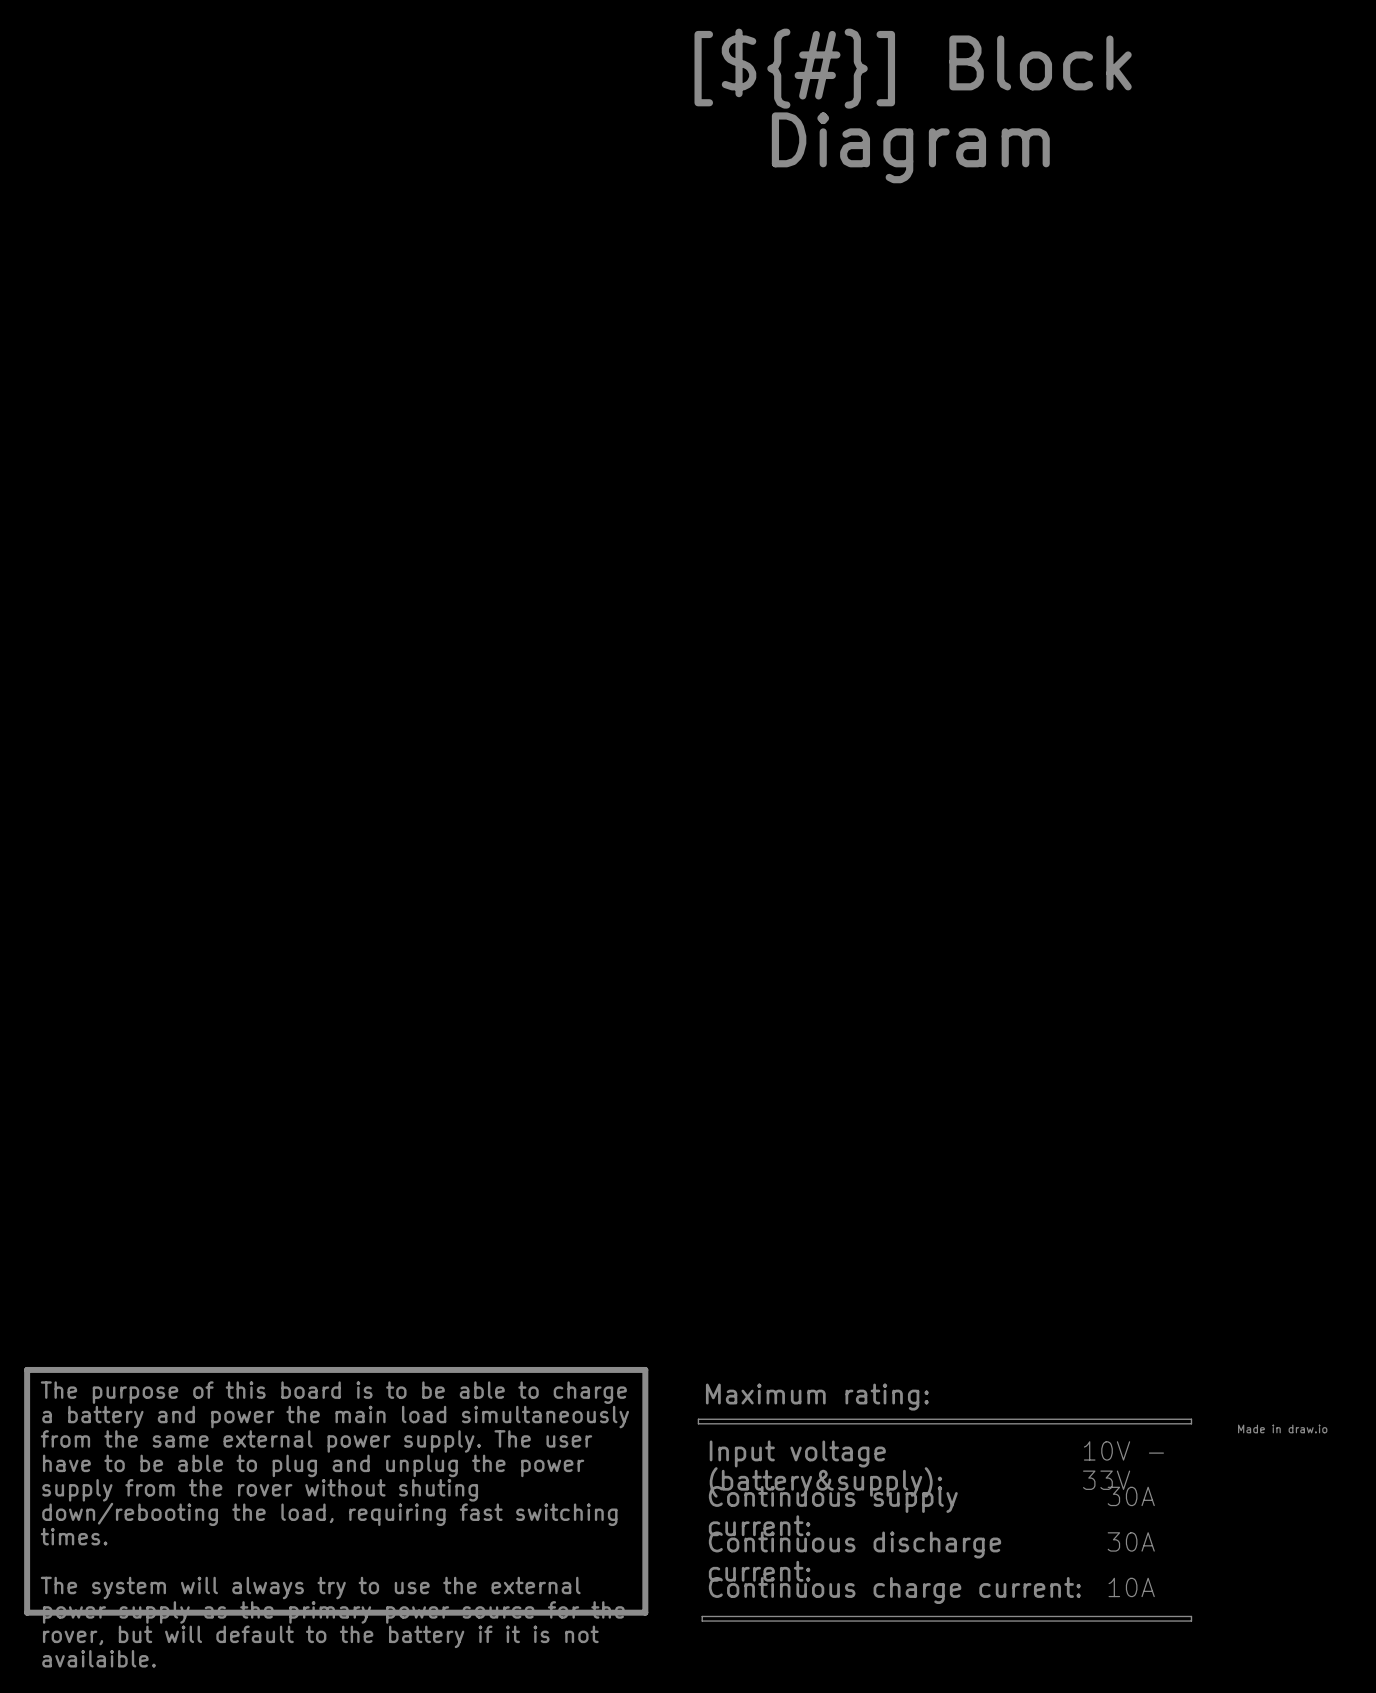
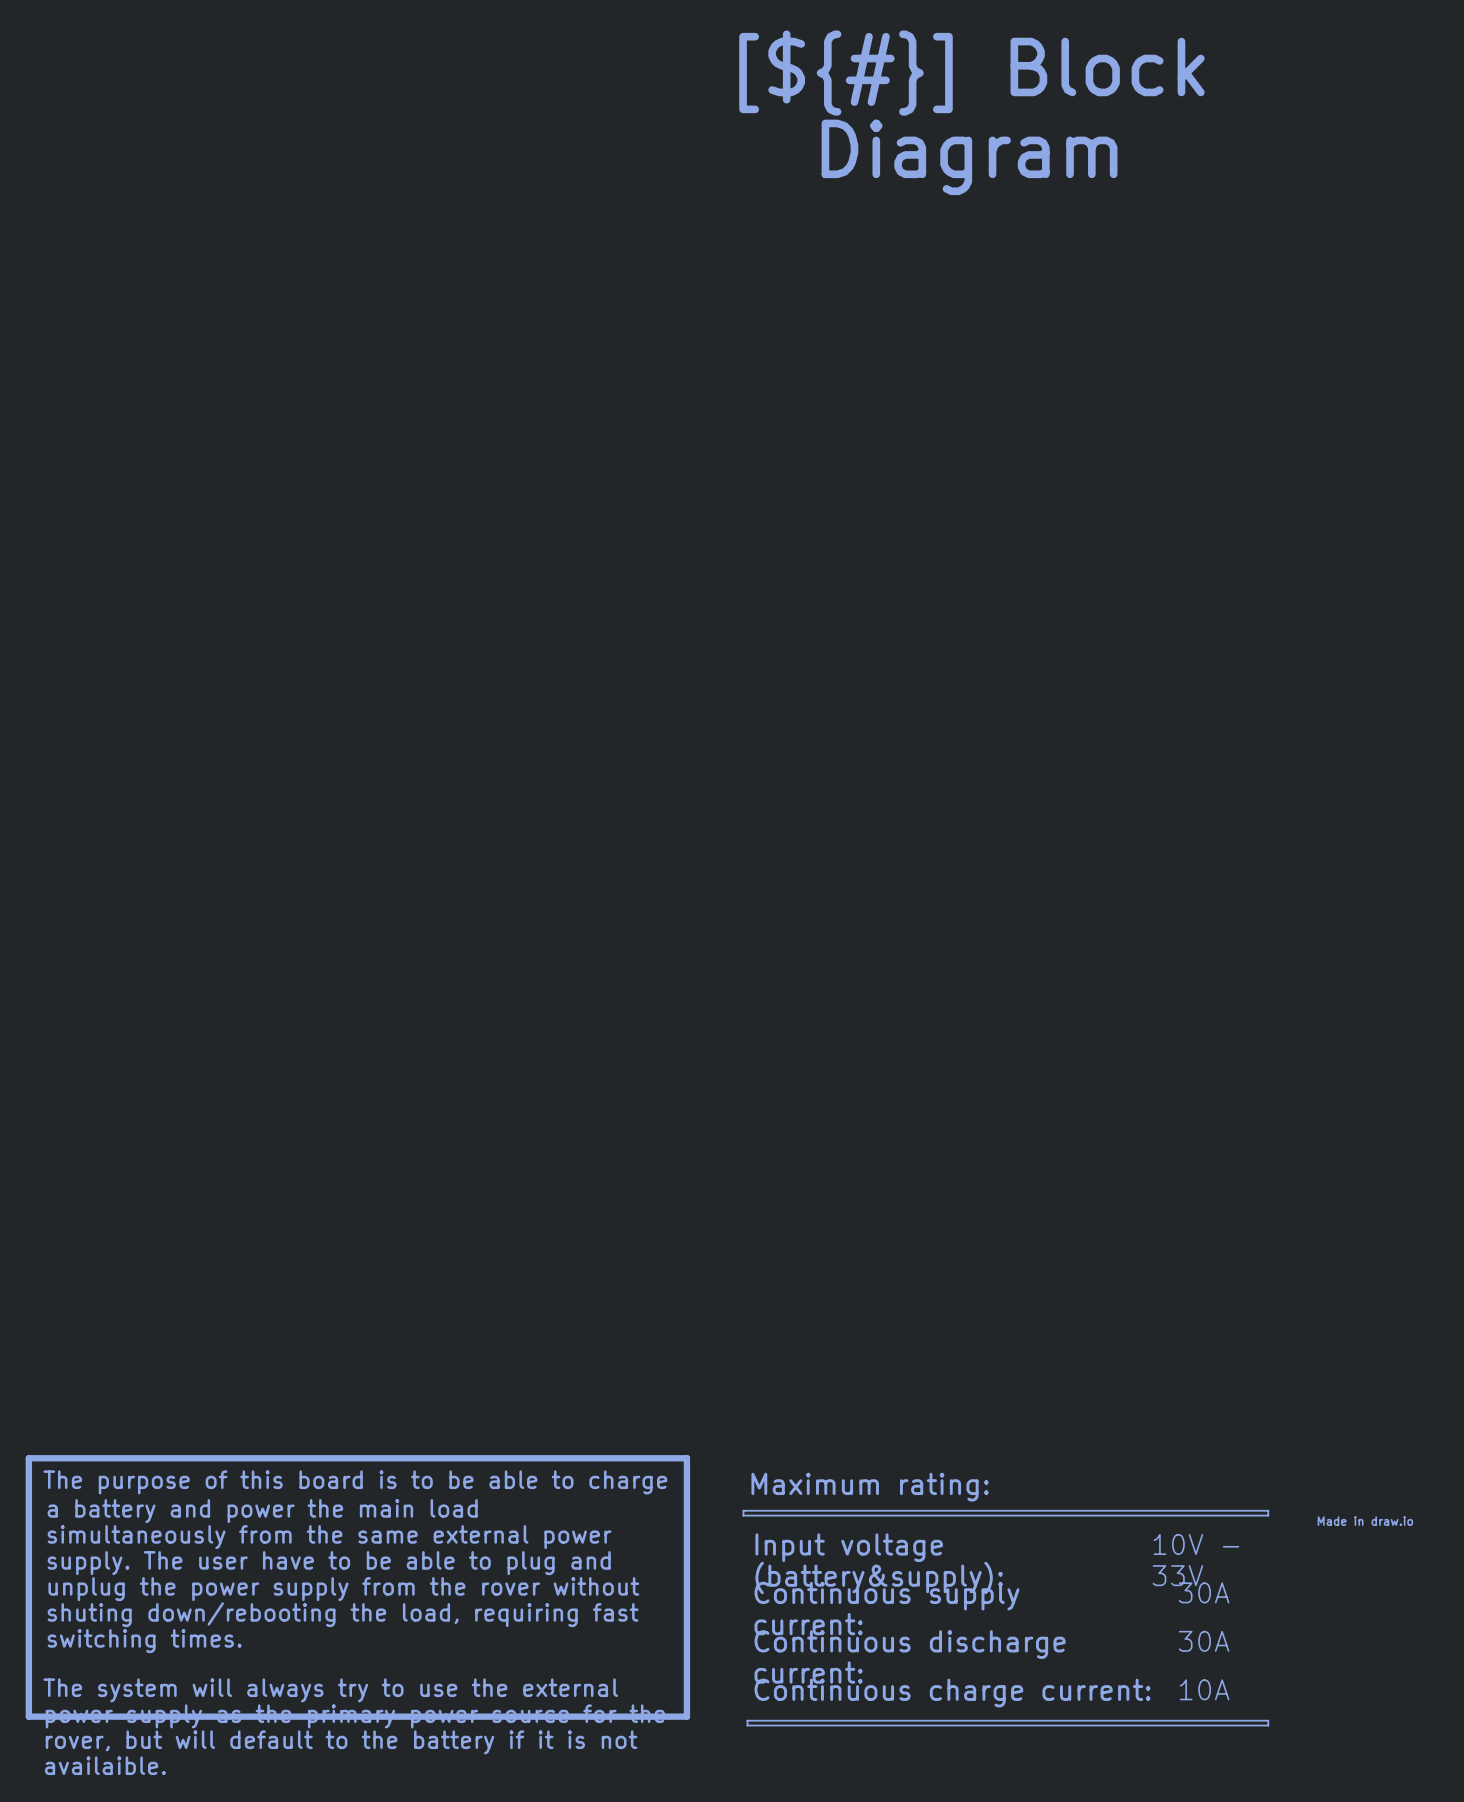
text: a battery and power the main load simultaneously (335, 1417) -> a battery and power the main load (262, 1511)
text: from the same external power supply. The user (316, 1441) -> simultaneously from the same external power (329, 1537)
text: have to be able to plug and unplug the power (313, 1465) -> supply. The user have to be able to plug and (329, 1563)
text: supply from the rover without shuting (260, 1490) -> unplug the power supply from the rover without (343, 1589)
text: down/rebooting the load, requiring fast switching (329, 1514) -> shuting down/rebooting the load, requiring fast (343, 1614)
text: times. (74, 1536) -> switching times. (144, 1641)

